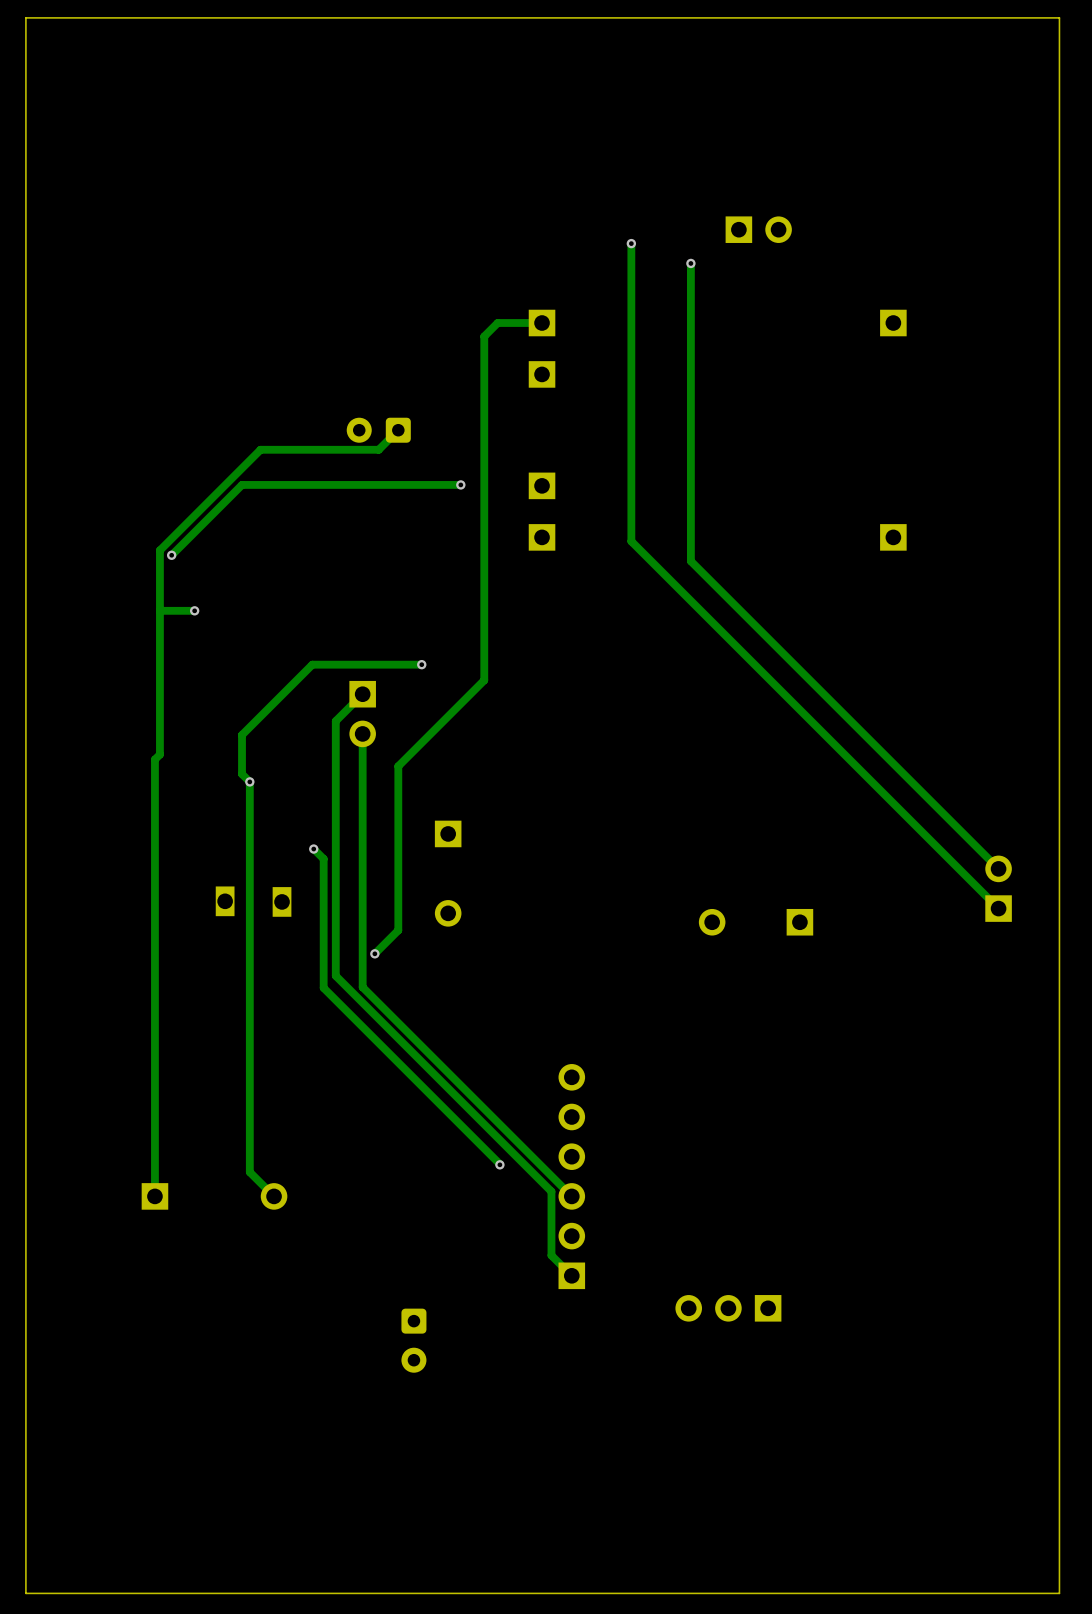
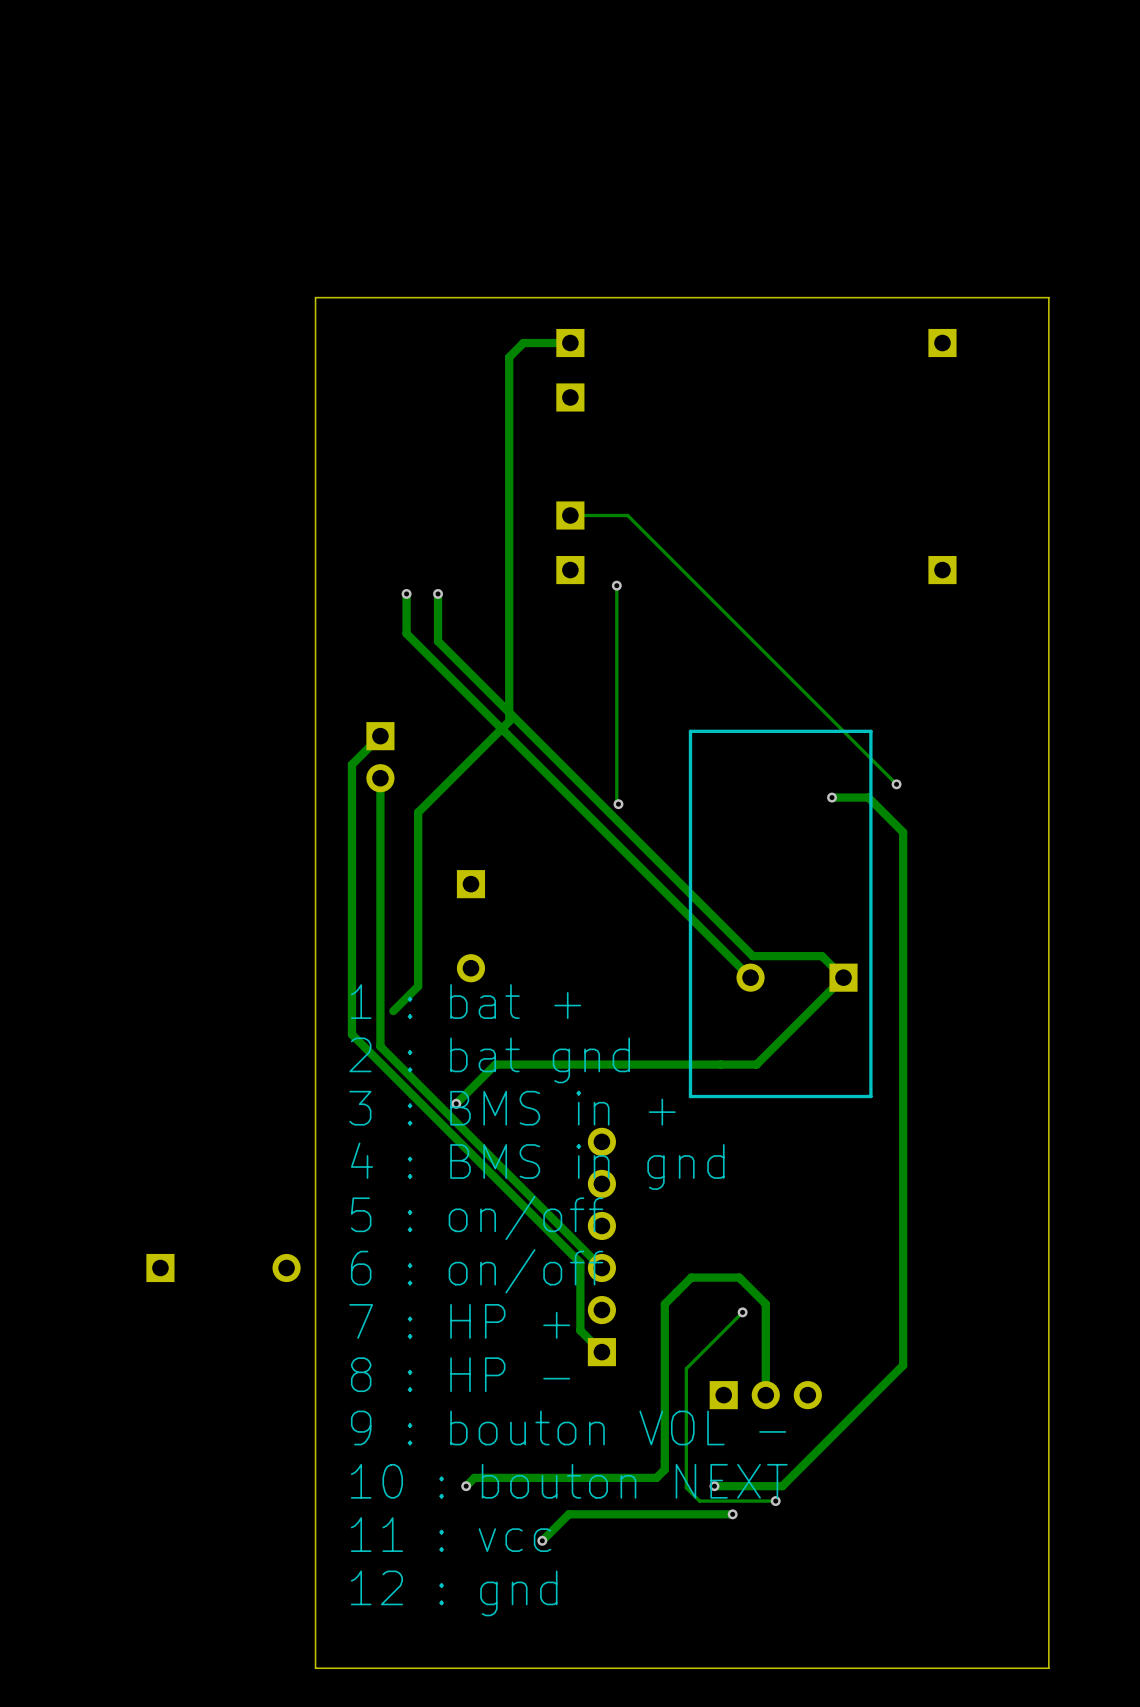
board edge: (1059, 17) (25, 17) (25, 1593) (1059, 1593) (1059, 17) -> (1048, 297) (1048, 1668) (315, 1668) (315, 297) (1048, 297)
part: (758, 229) -> none
track: (631, 243) (631, 541) (998, 908) -> none
via: (631, 243) -> none
track: (690, 263) (690, 561) (998, 868) -> none
via: (690, 263) -> none
part: (378, 430) -> none
track: (398, 430) (378, 449) (260, 449) (159, 550) (159, 754) (154, 759) (154, 1196) -> none
track: (460, 484) (242, 484) (171, 555) -> none
via: (460, 484) -> none
track: none -> (570, 518) (570, 515) (627, 515) (896, 784)
track: none -> (616, 585) (616, 802) (618, 804)
via: none -> (616, 585)
via: (171, 555) -> none
track: none -> (406, 593) (406, 633) (750, 977)
via: none -> (406, 593)
track: none -> (438, 593) (438, 641) (752, 956) (821, 956) (843, 977) (756, 1064) (495, 1064) (456, 1103)
via: none -> (438, 593)
track: (194, 610) (159, 610) -> none
via: (194, 610) -> none
track: (421, 664) (312, 664) (242, 735) (242, 774) (249, 781) (249, 1172) (274, 1196) -> none
via: (421, 664) -> none
line: none -> (870, 731) (690, 731) (690, 1096) (870, 1096) (870, 731)
via: none -> (896, 784)
track: none -> (832, 797) (868, 797) (903, 832) (903, 1365) (782, 1486) (714, 1486)
via: none -> (832, 797)
via: none -> (618, 804)
via: (249, 781) -> none
track: (313, 849) (323, 858) (323, 987) (499, 1164) -> none
via: (313, 849) -> none
part: (998, 888) -> none
part: (225, 901) -> none
part: (282, 901) -> none
text: none -> 1 : bat + (466, 1001)
via: (374, 953) -> none
text: none -> 2 : bat gnd (489, 1060)
via: none -> (456, 1103)
text: none -> 3 : BMS in + (512, 1108)
text: none -> 4 : BMS in gnd (537, 1166)
text: none -> 5 : on/off (477, 1217)
via: (499, 1164) -> none
text: none -> 6 : on/off (477, 1271)
track: none -> (742, 1312) (686, 1368) (686, 1487) (699, 1501) (775, 1501)
via: none -> (742, 1312)
text: none -> 7 : HP + (459, 1321)
text: none -> 8 : HP - (460, 1374)
part rotation: 0° (728, 1308) -> 180° (765, 1395)
track: none -> (765, 1395) (765, 1304) (739, 1277) (691, 1277) (664, 1304) (664, 1469) (656, 1477) (474, 1477) (466, 1486)
part: (413, 1340) -> none
text: none -> 9 : bouton VOL - (568, 1428)
text: none -> 10 : bouton NEXT (569, 1481)
via: none -> (466, 1486)
via: none -> (714, 1486)
via: none -> (775, 1501)
track: none -> (732, 1514) (568, 1514) (542, 1540)
via: none -> (732, 1514)
text: none -> 11 : vcc (451, 1534)
via: none -> (542, 1540)
text: none -> 12 : gnd (454, 1593)

